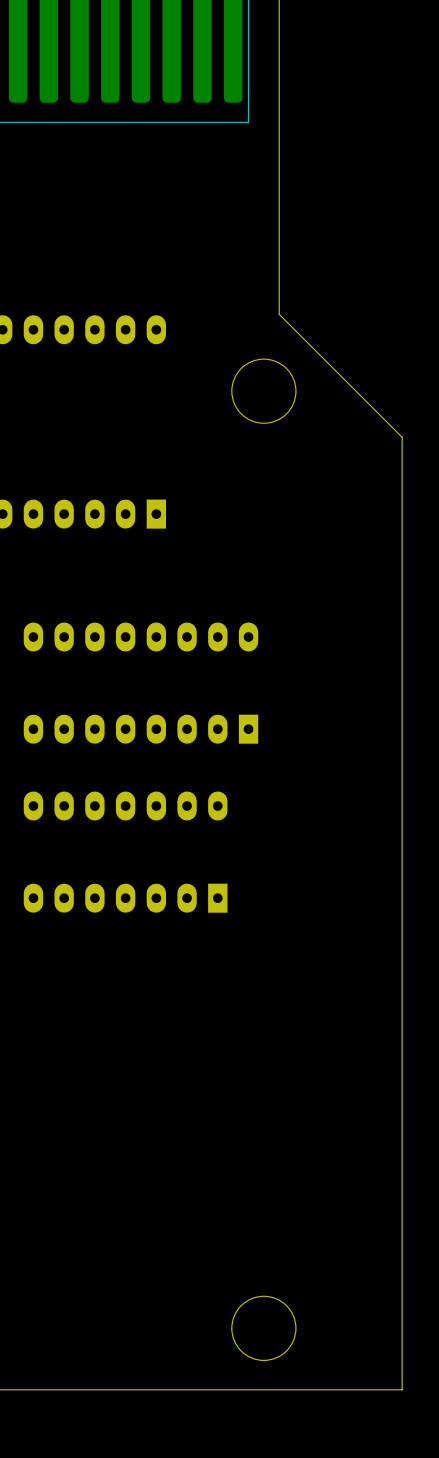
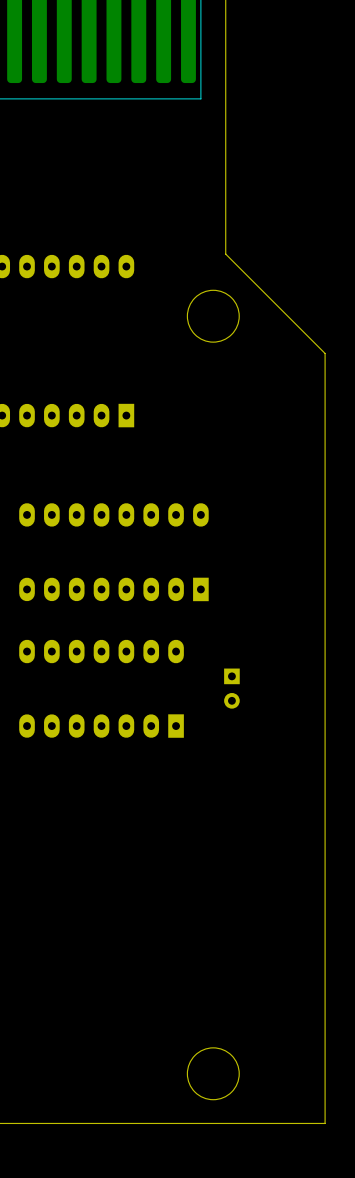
part: none -> (231, 688)

